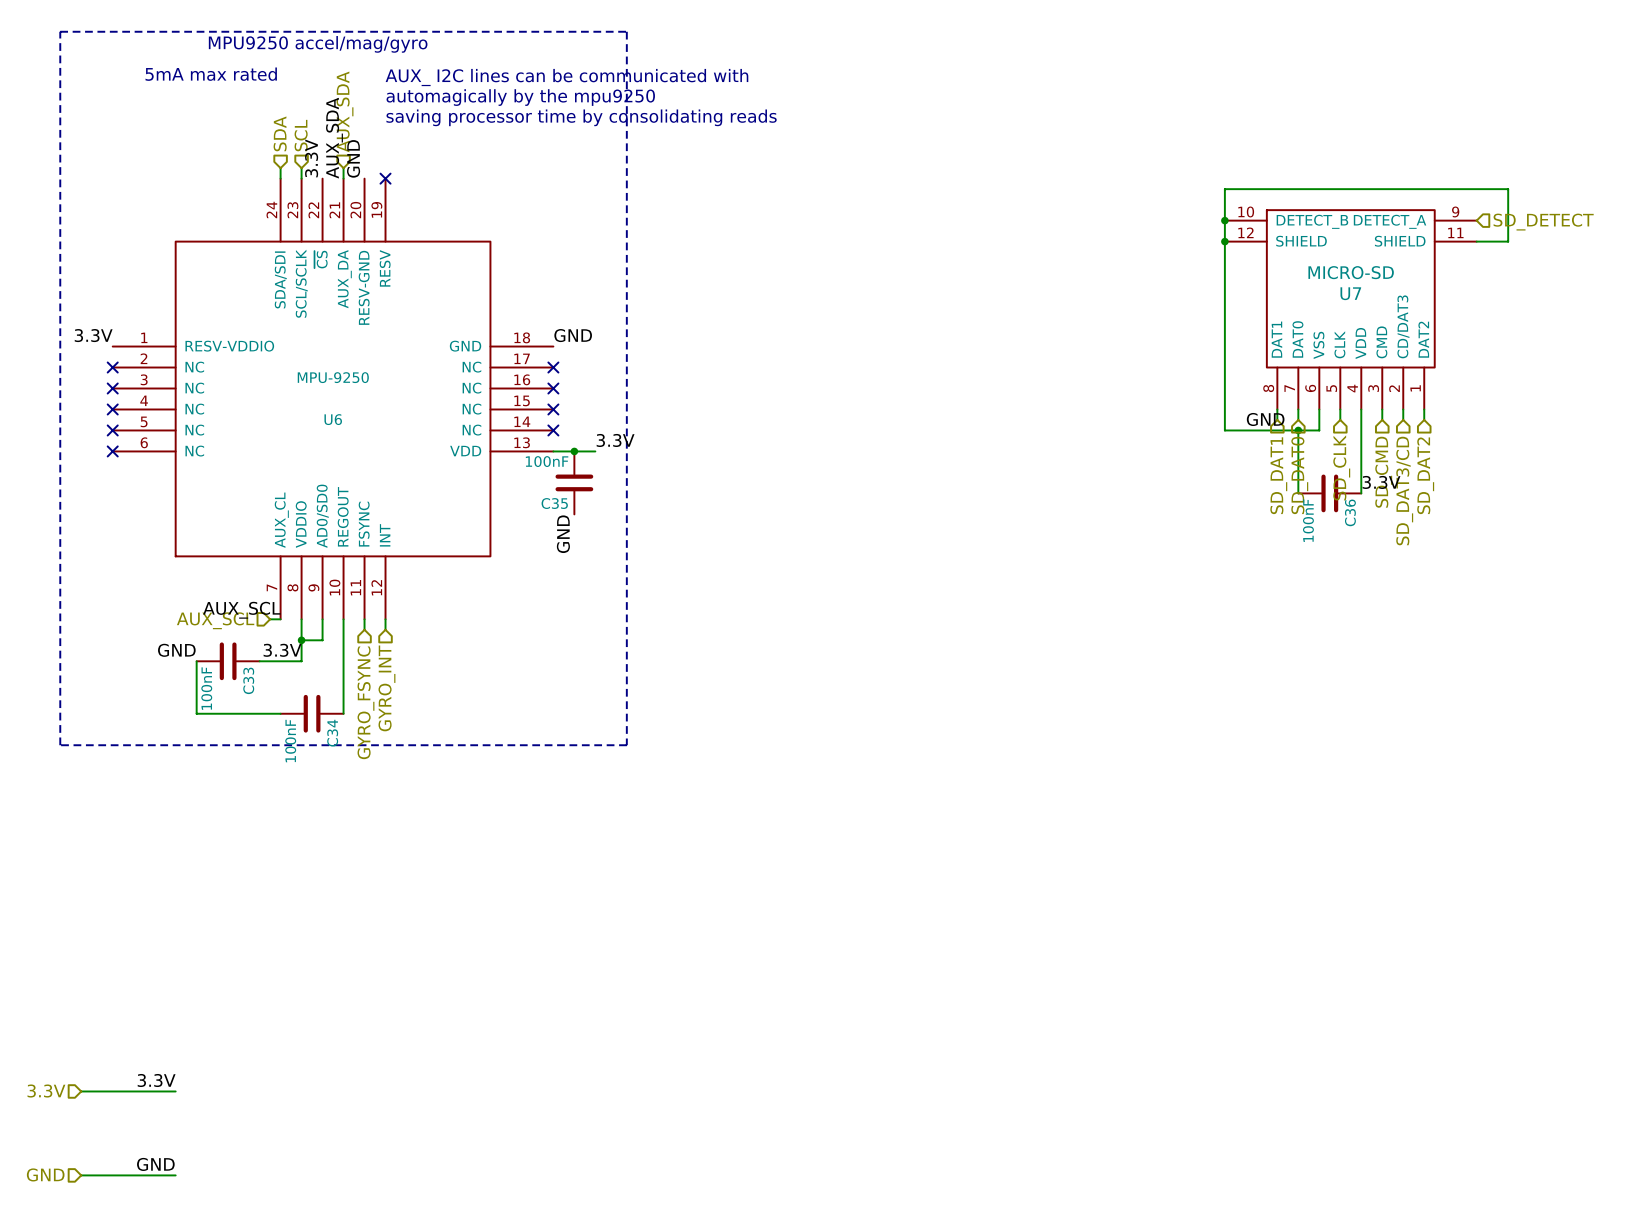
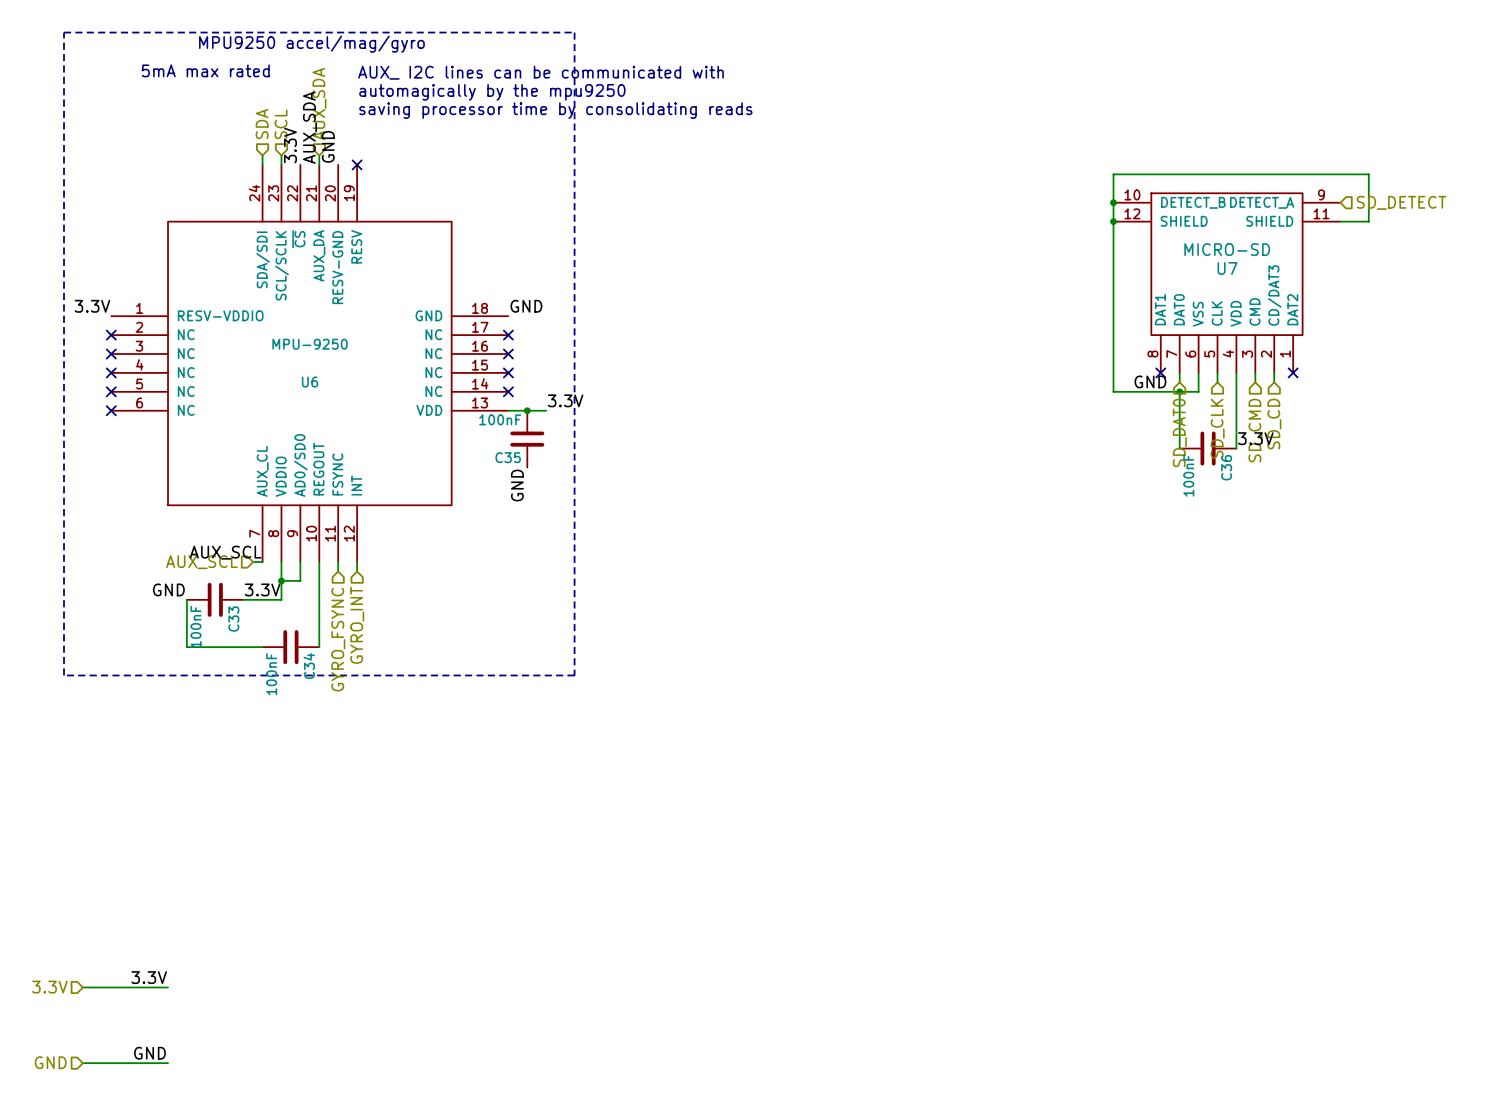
wire: (1277, 409) (1277, 419) -> none
no-connect mark: none -> (1160, 372)
wire: (1424, 409) (1424, 419) -> none
no-connect mark: none -> (1293, 372)
hierarchical label: SD_DAT1 (1278, 475) -> none
hierarchical label: SD_DAT2 (1425, 475) -> none
hierarchical label: SD_DAT3/CD (1404, 491) -> SD_CD (1274, 424)

